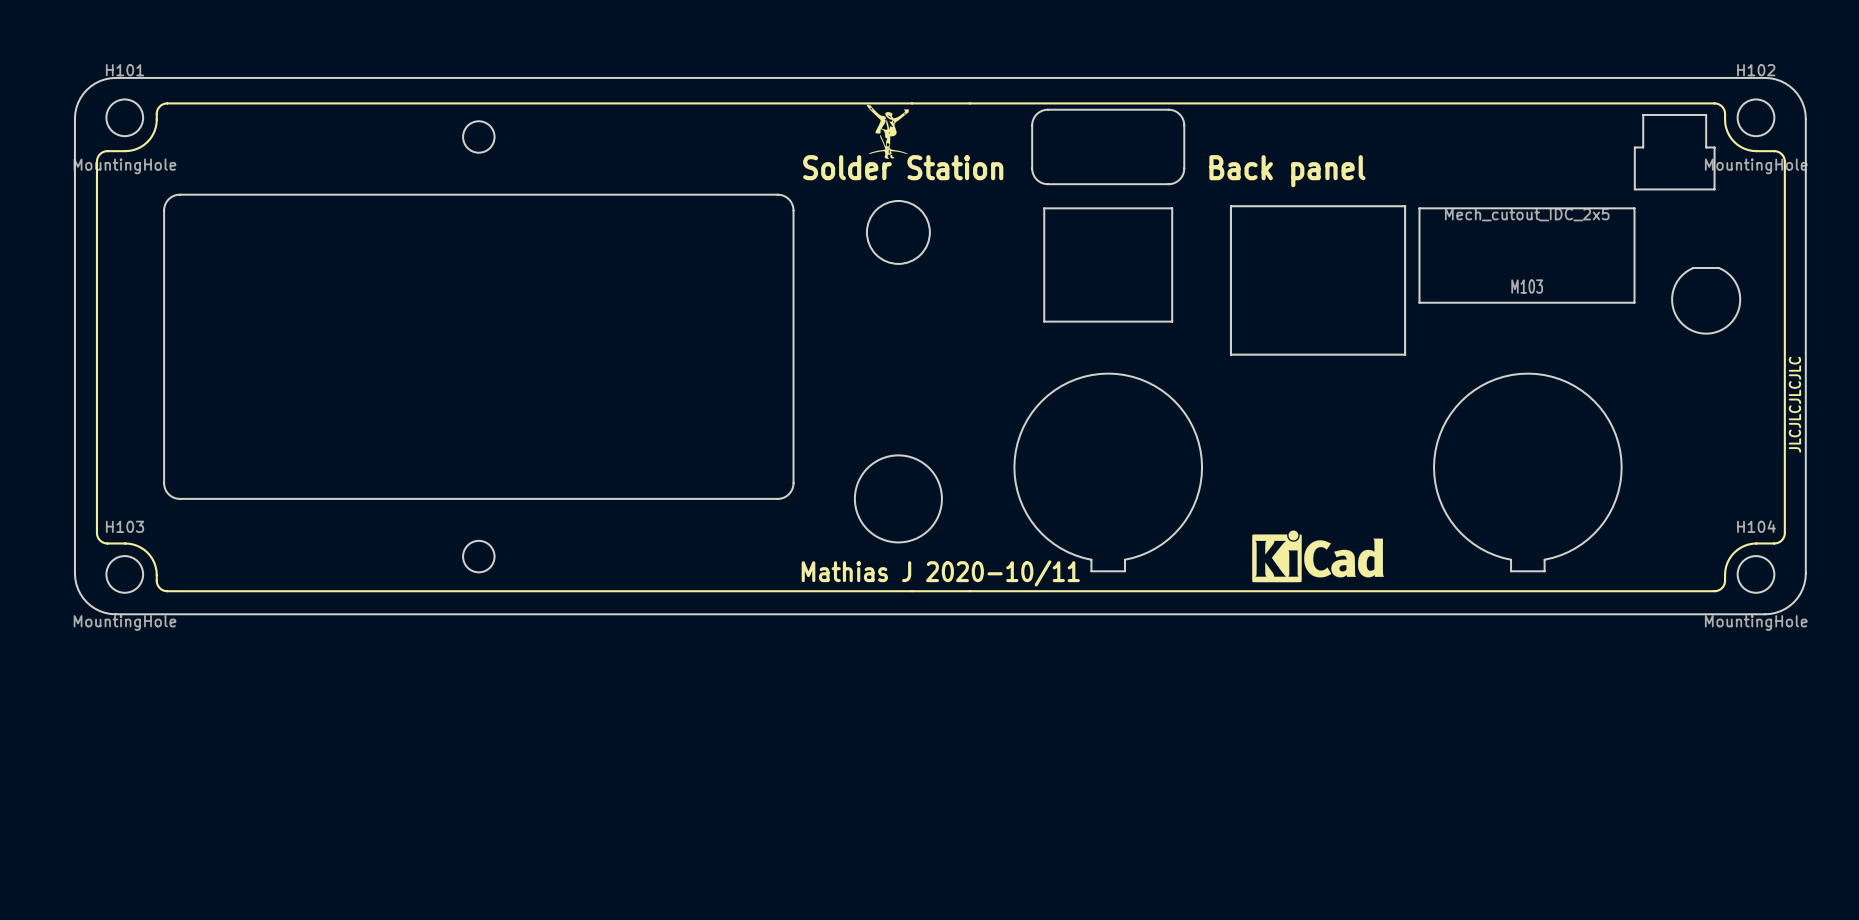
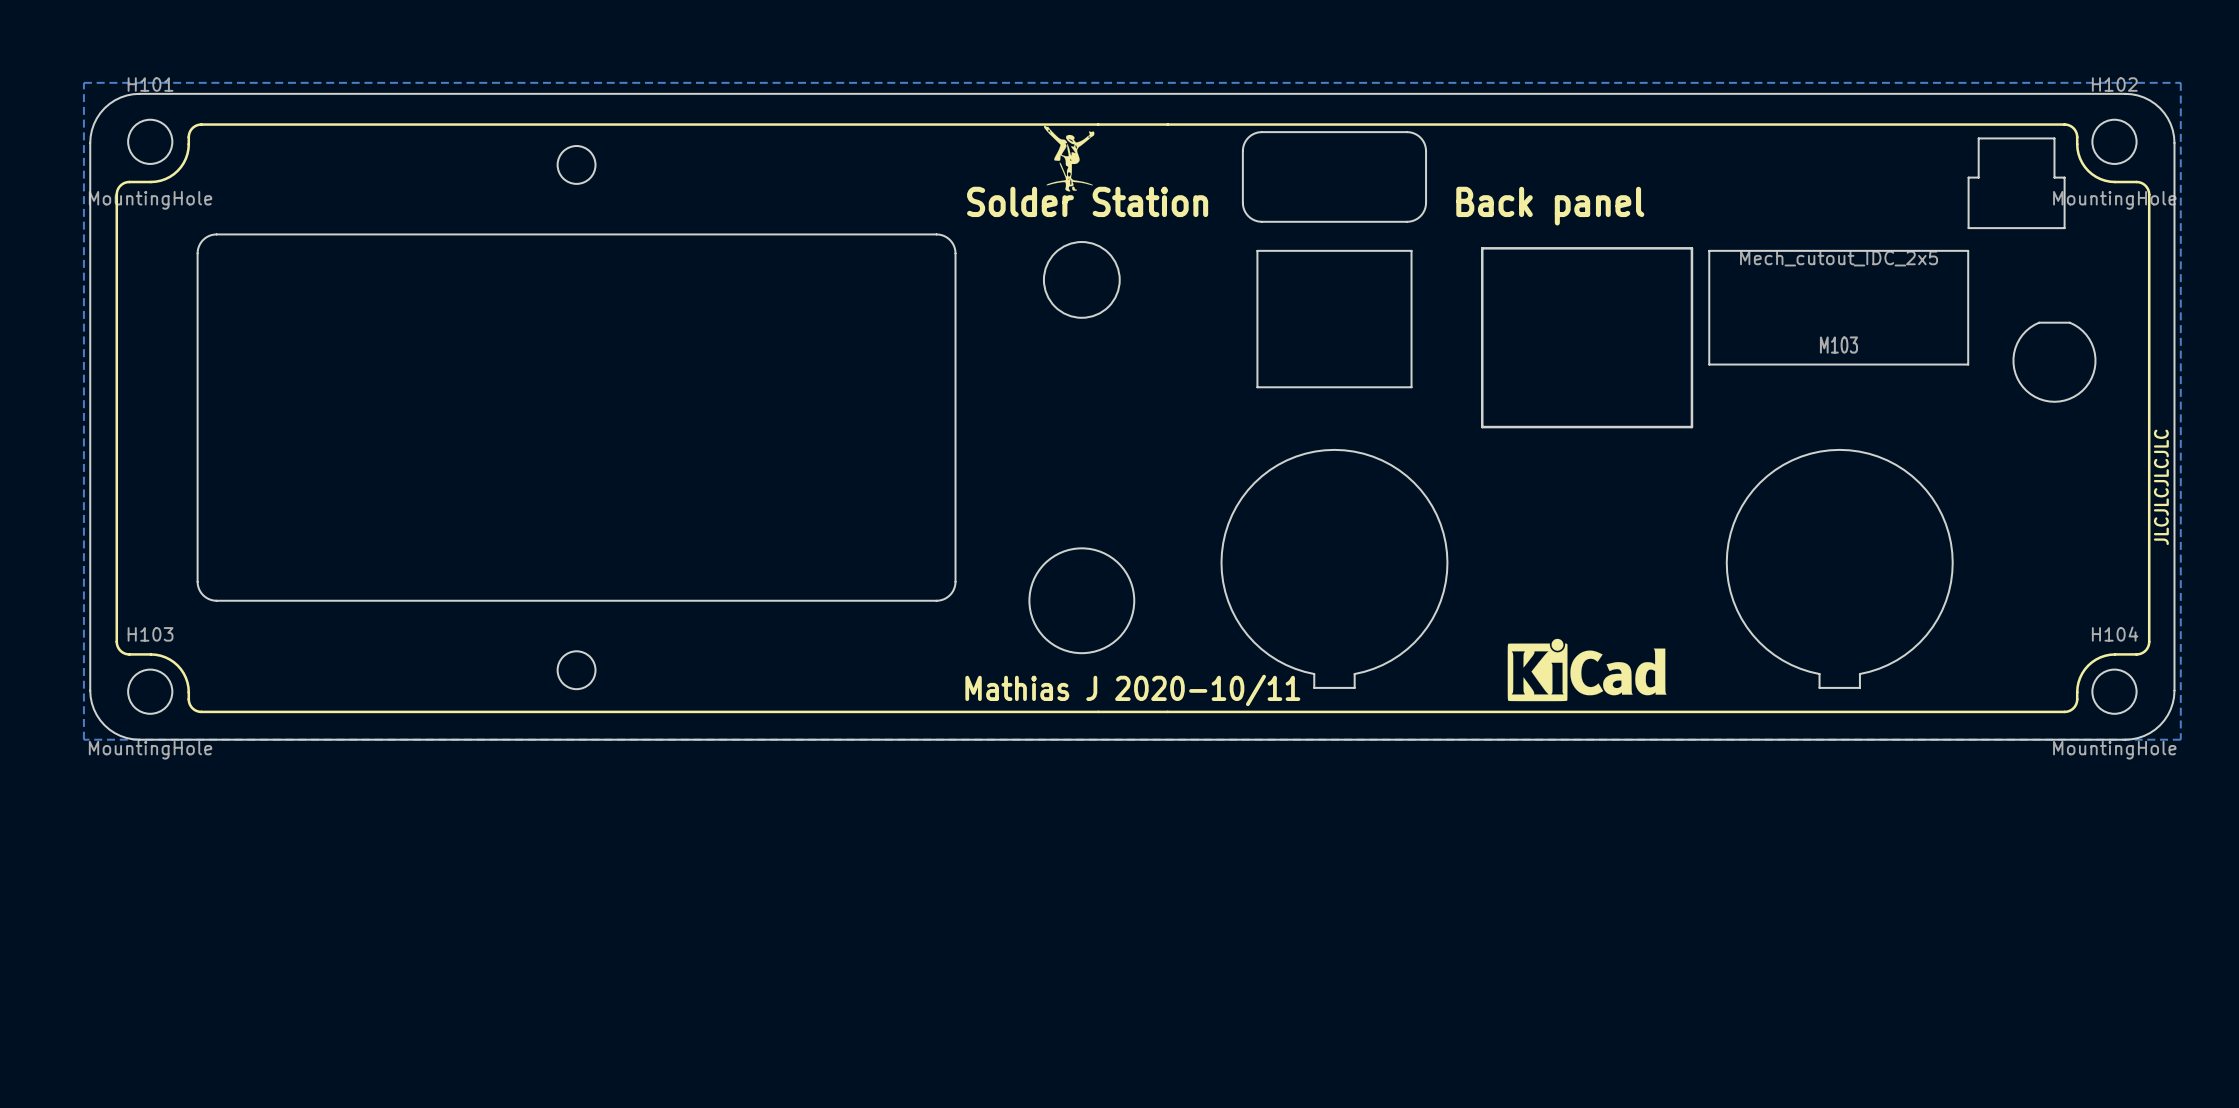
bottom zone outline: none -> (83, 82) (83, 739) (2180, 739) (2180, 82) (83, 82)

